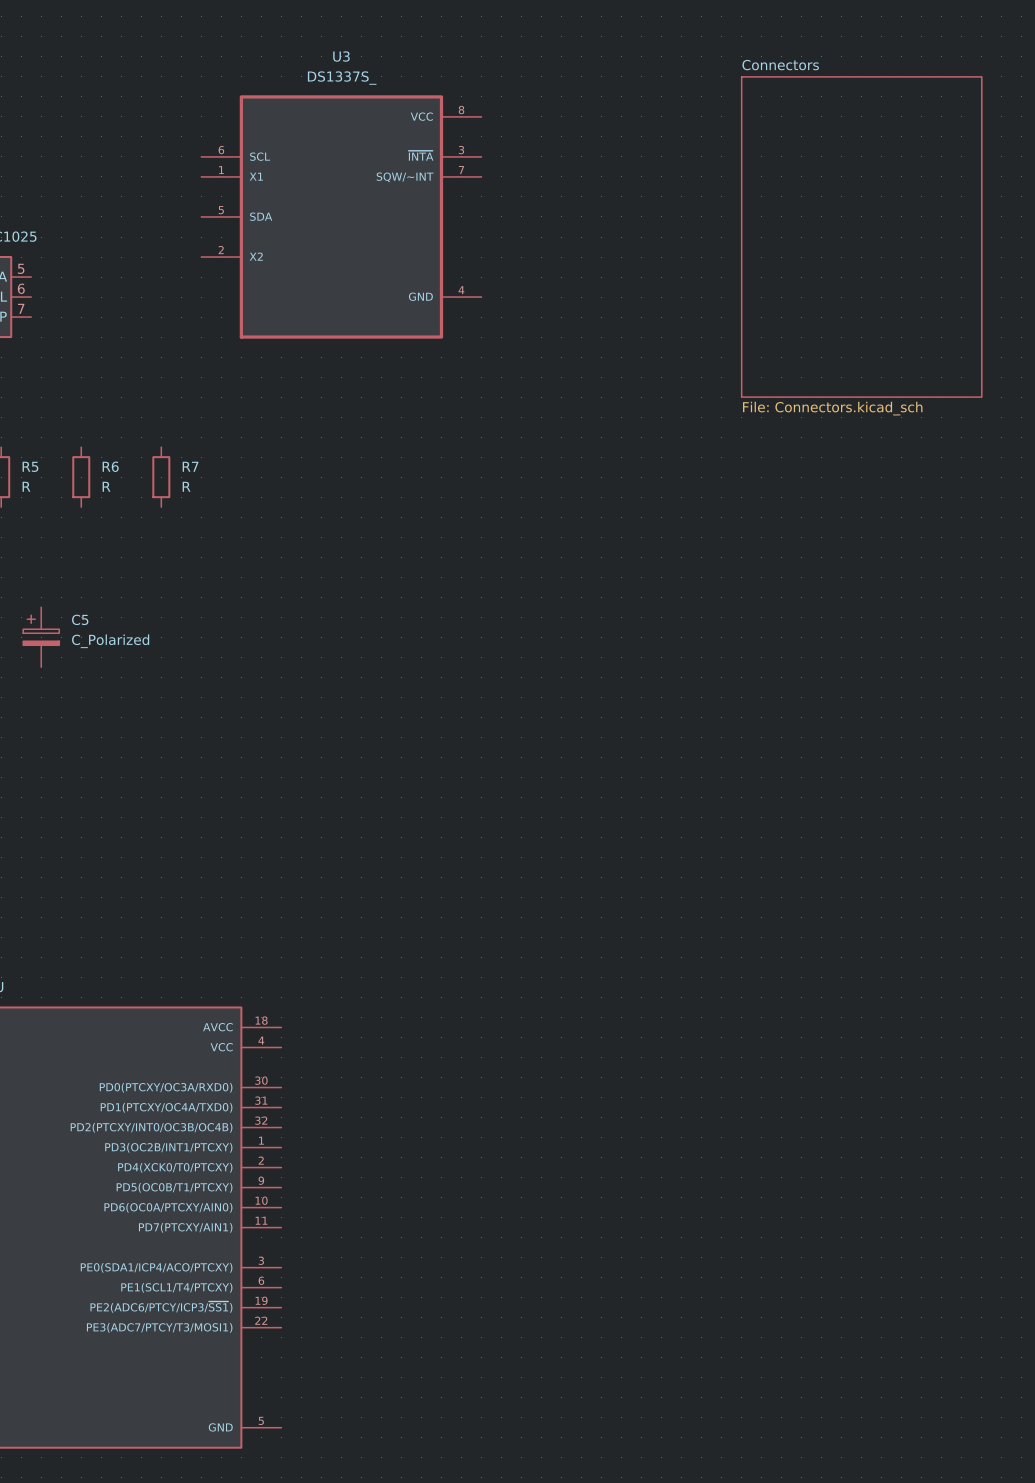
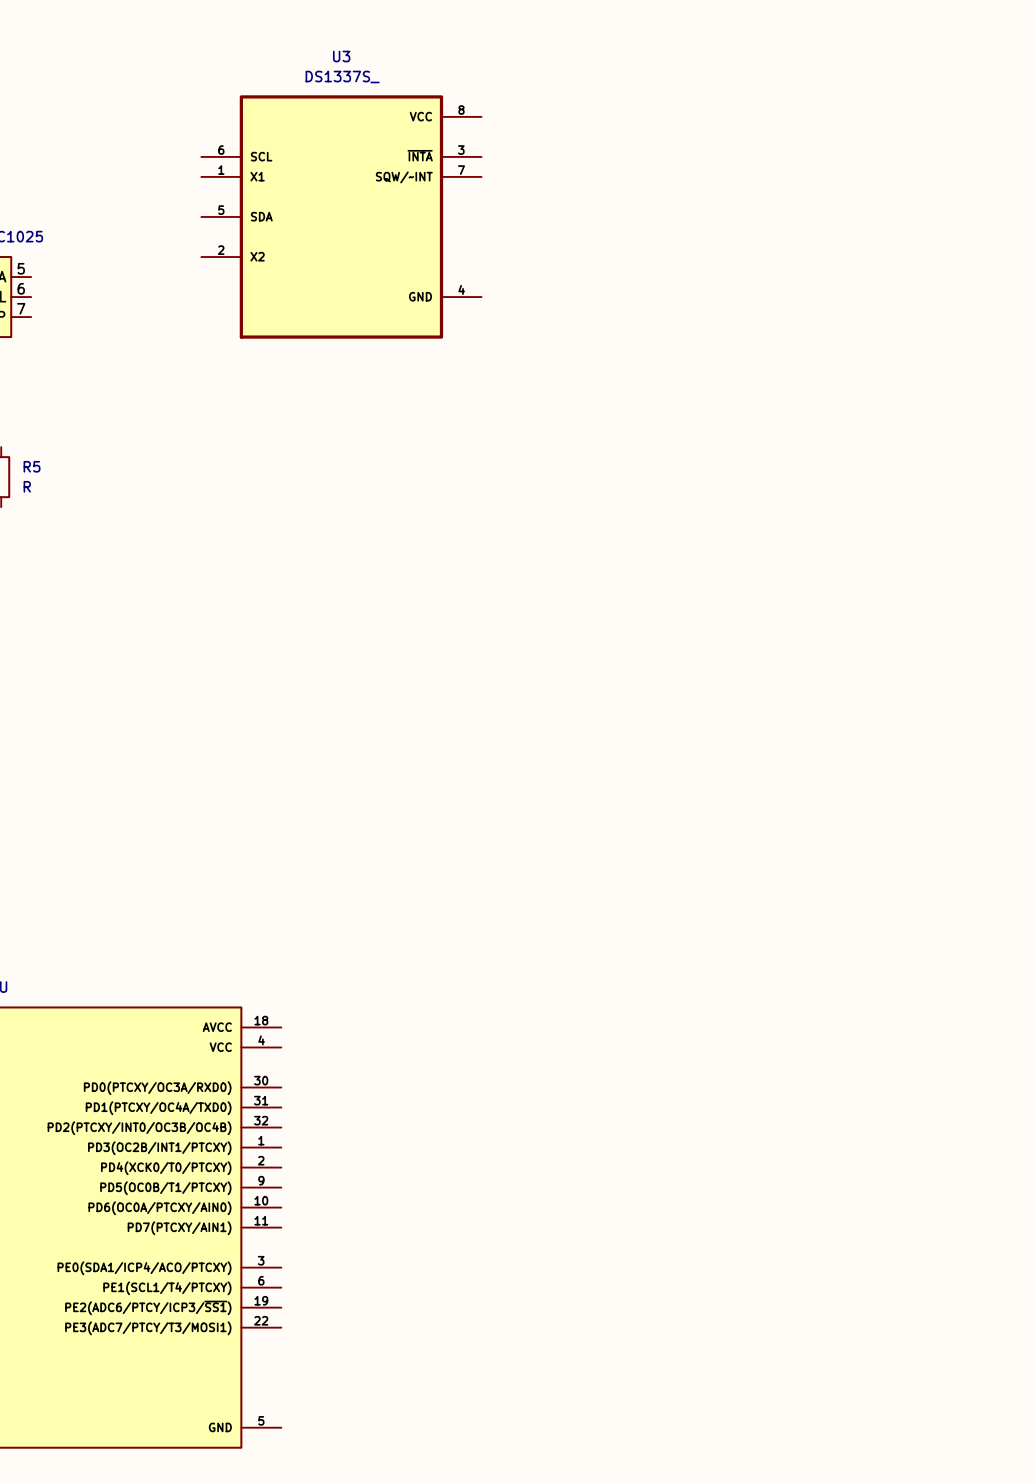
sheet Connectors: File: Connectors.kicad_sch (861, 237) -> none
R6: R (81, 477) -> none
R7: R (161, 477) -> none
C5: C_Polarized (41, 637) -> none

